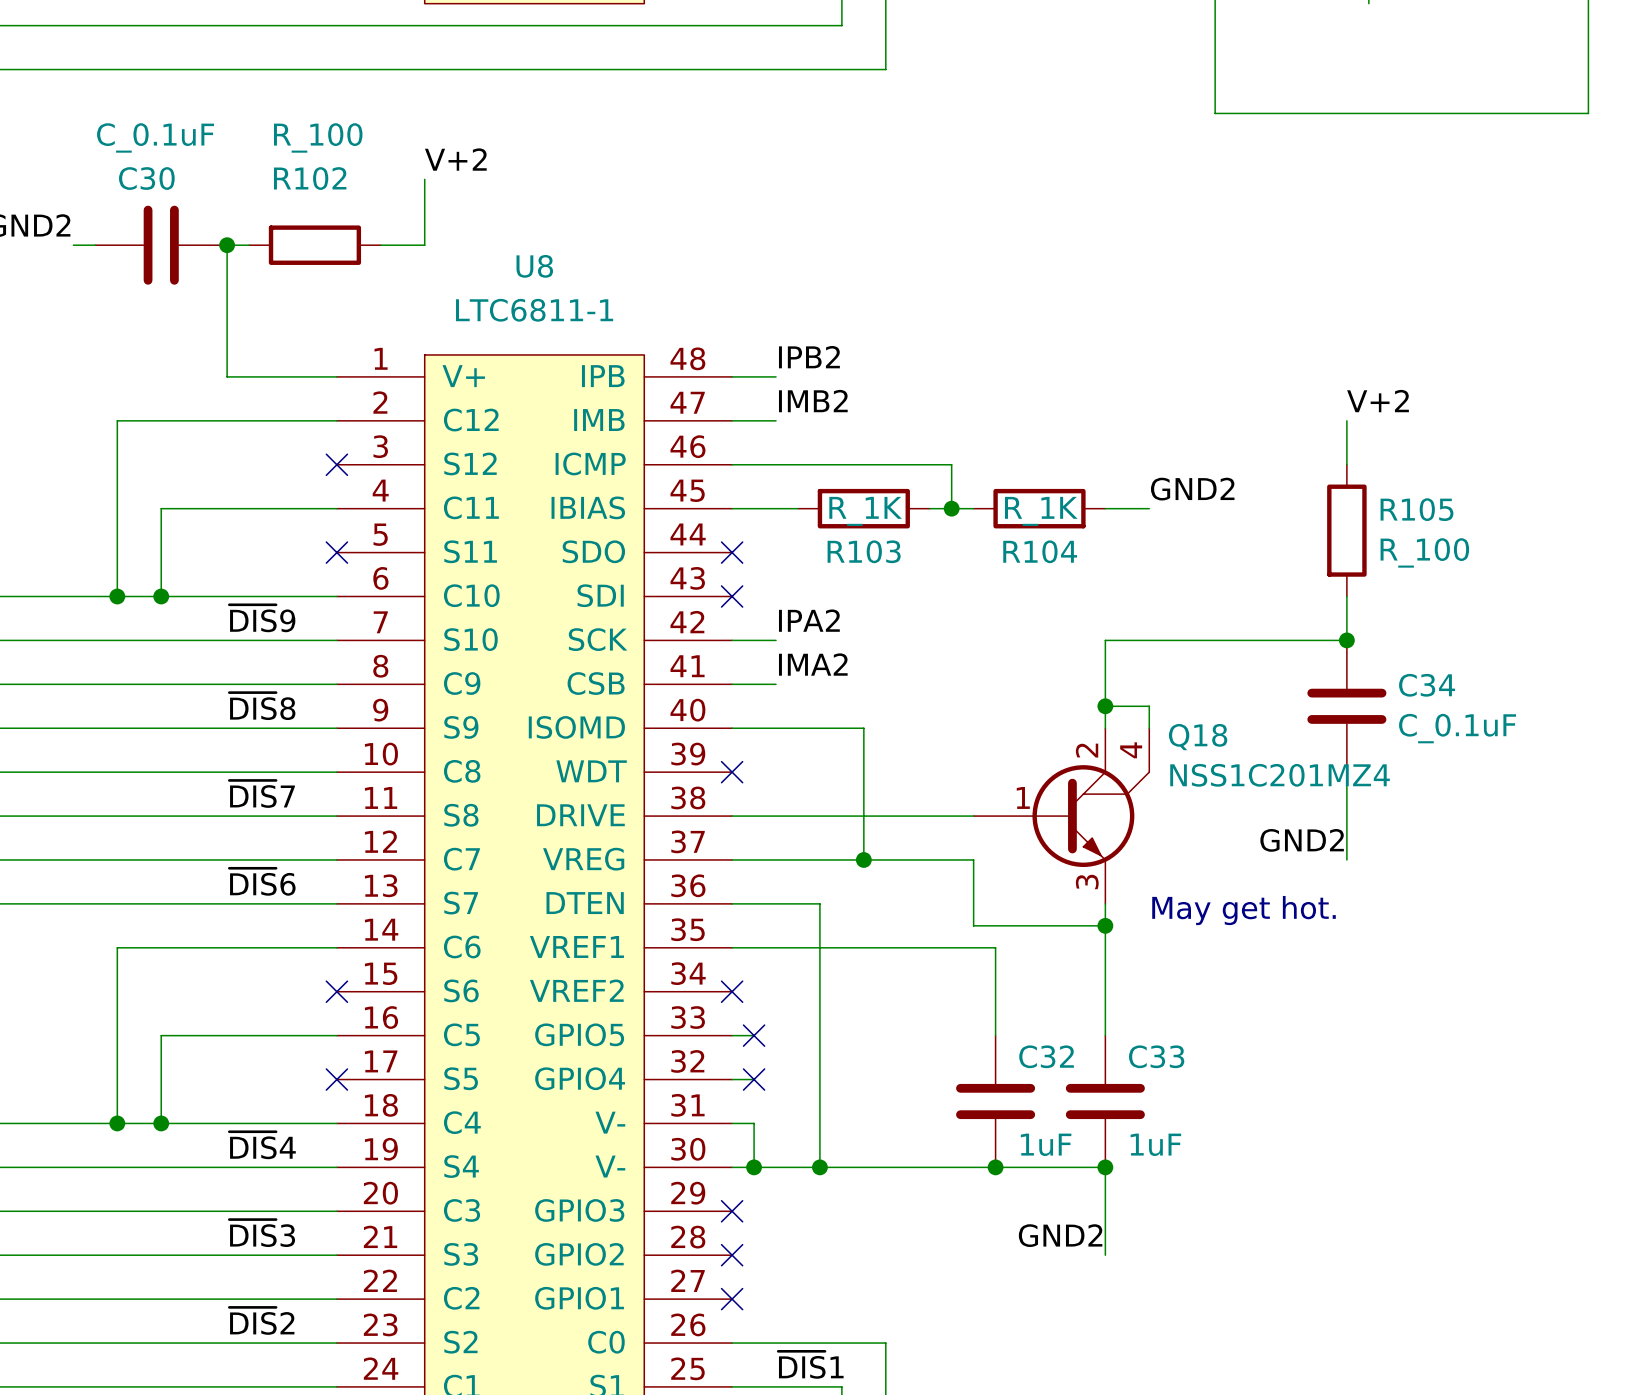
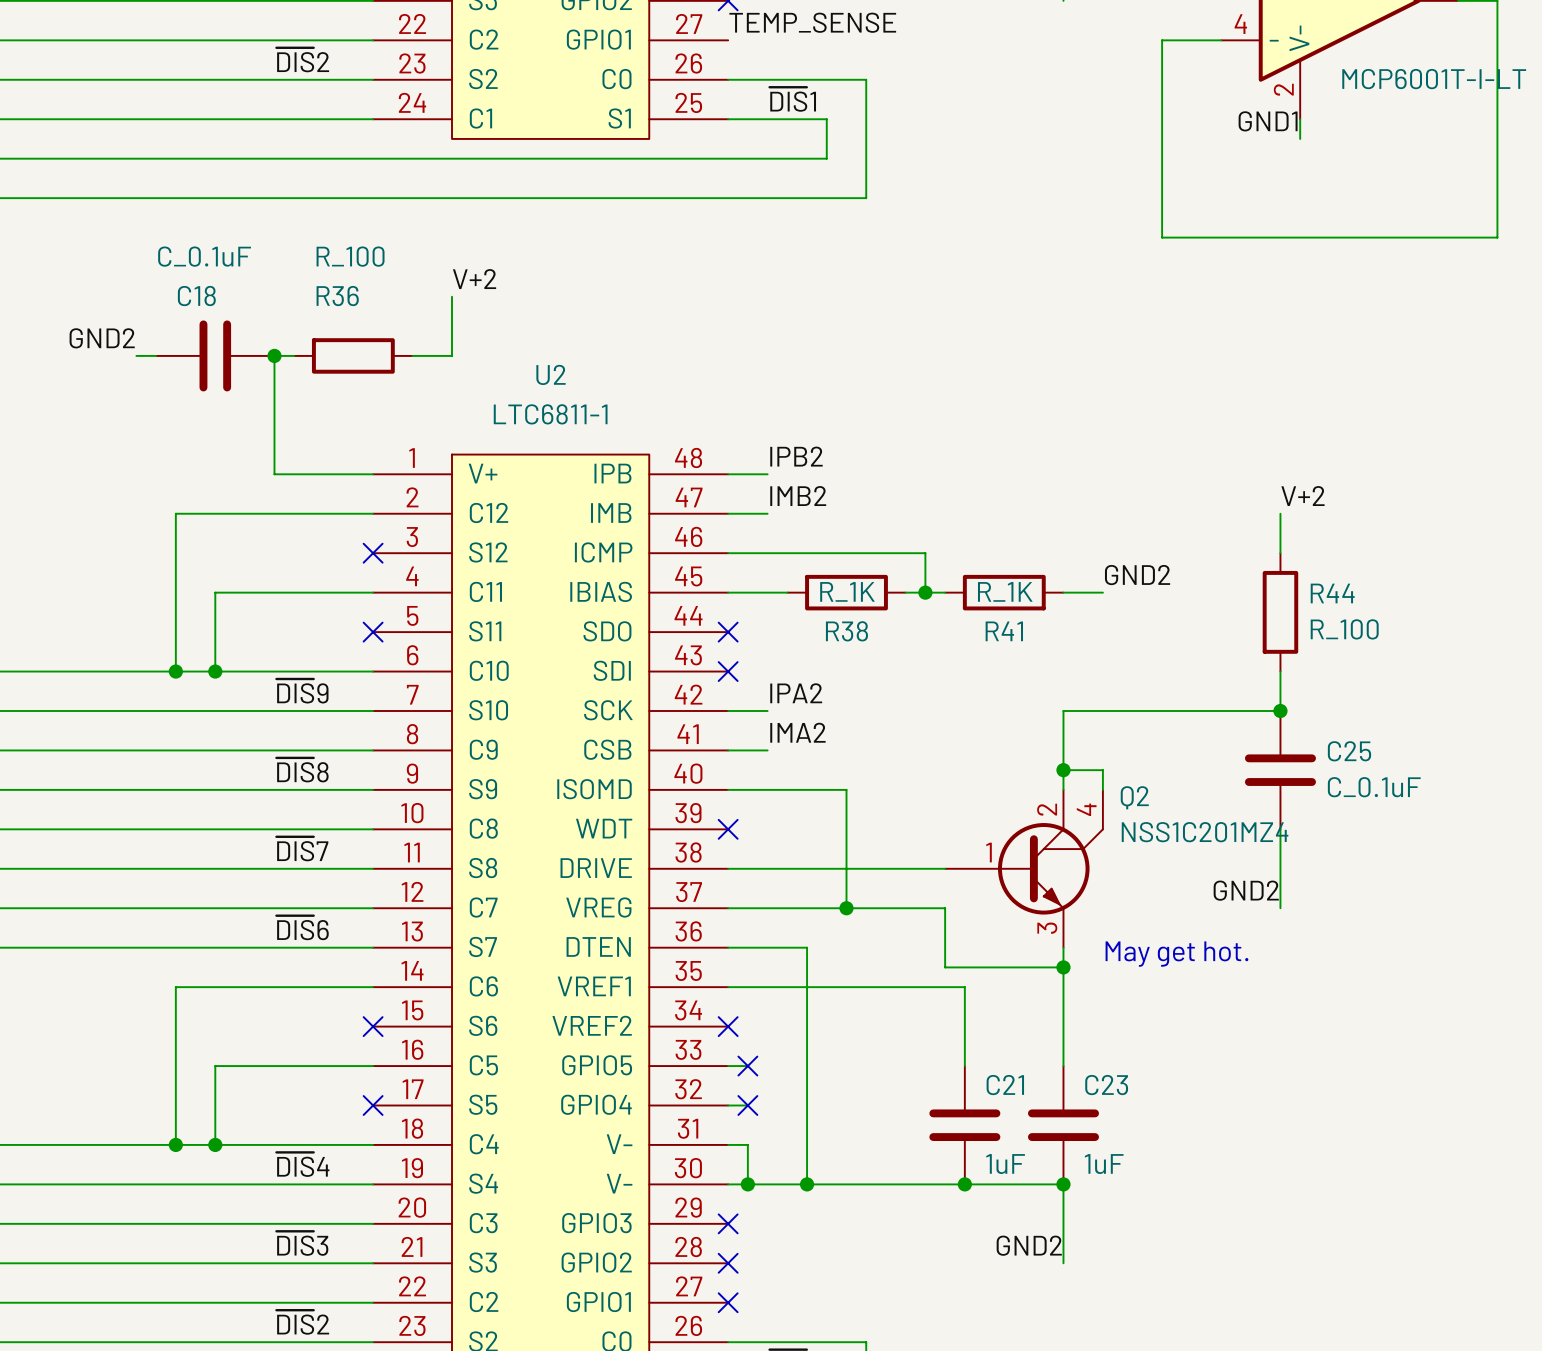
C30 name: C30 (146, 178) -> C18 (196, 296)
R102 name: R102 (310, 178) -> R36 (337, 296)
U8 name: U8 (534, 266) -> U2 (551, 374)
R105 name: R105 (1416, 509) -> R44 (1332, 593)
R103 name: R103 (864, 551) -> R38 (846, 631)
R104 name: R104 (1040, 551) -> R41 (1004, 631)
C34 name: C34 (1427, 685) -> C25 (1349, 751)
Q18 name: Q18 (1198, 737) -> Q2 (1134, 797)
C32 name: C32 (1046, 1056) -> C21 (1005, 1085)
C33 name: C33 (1156, 1056) -> C23 (1106, 1085)

